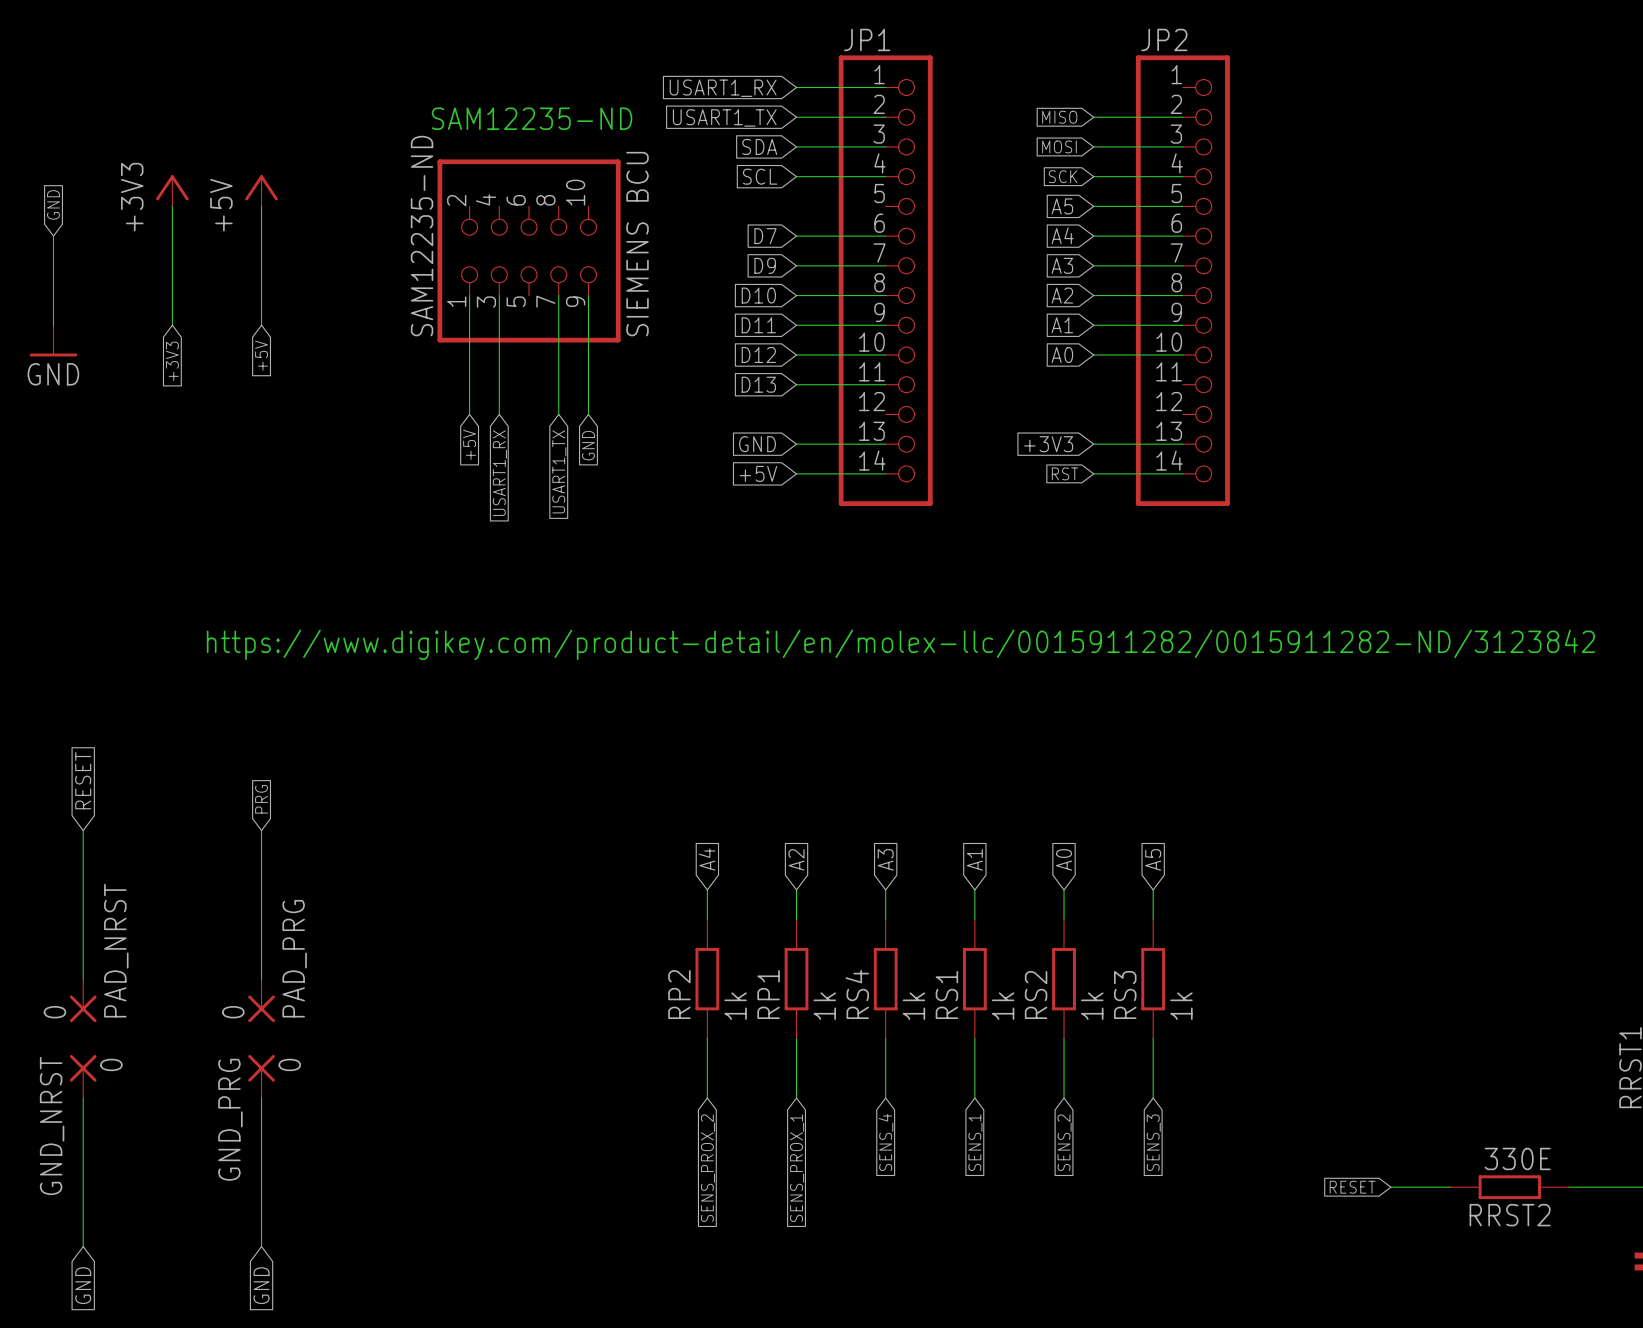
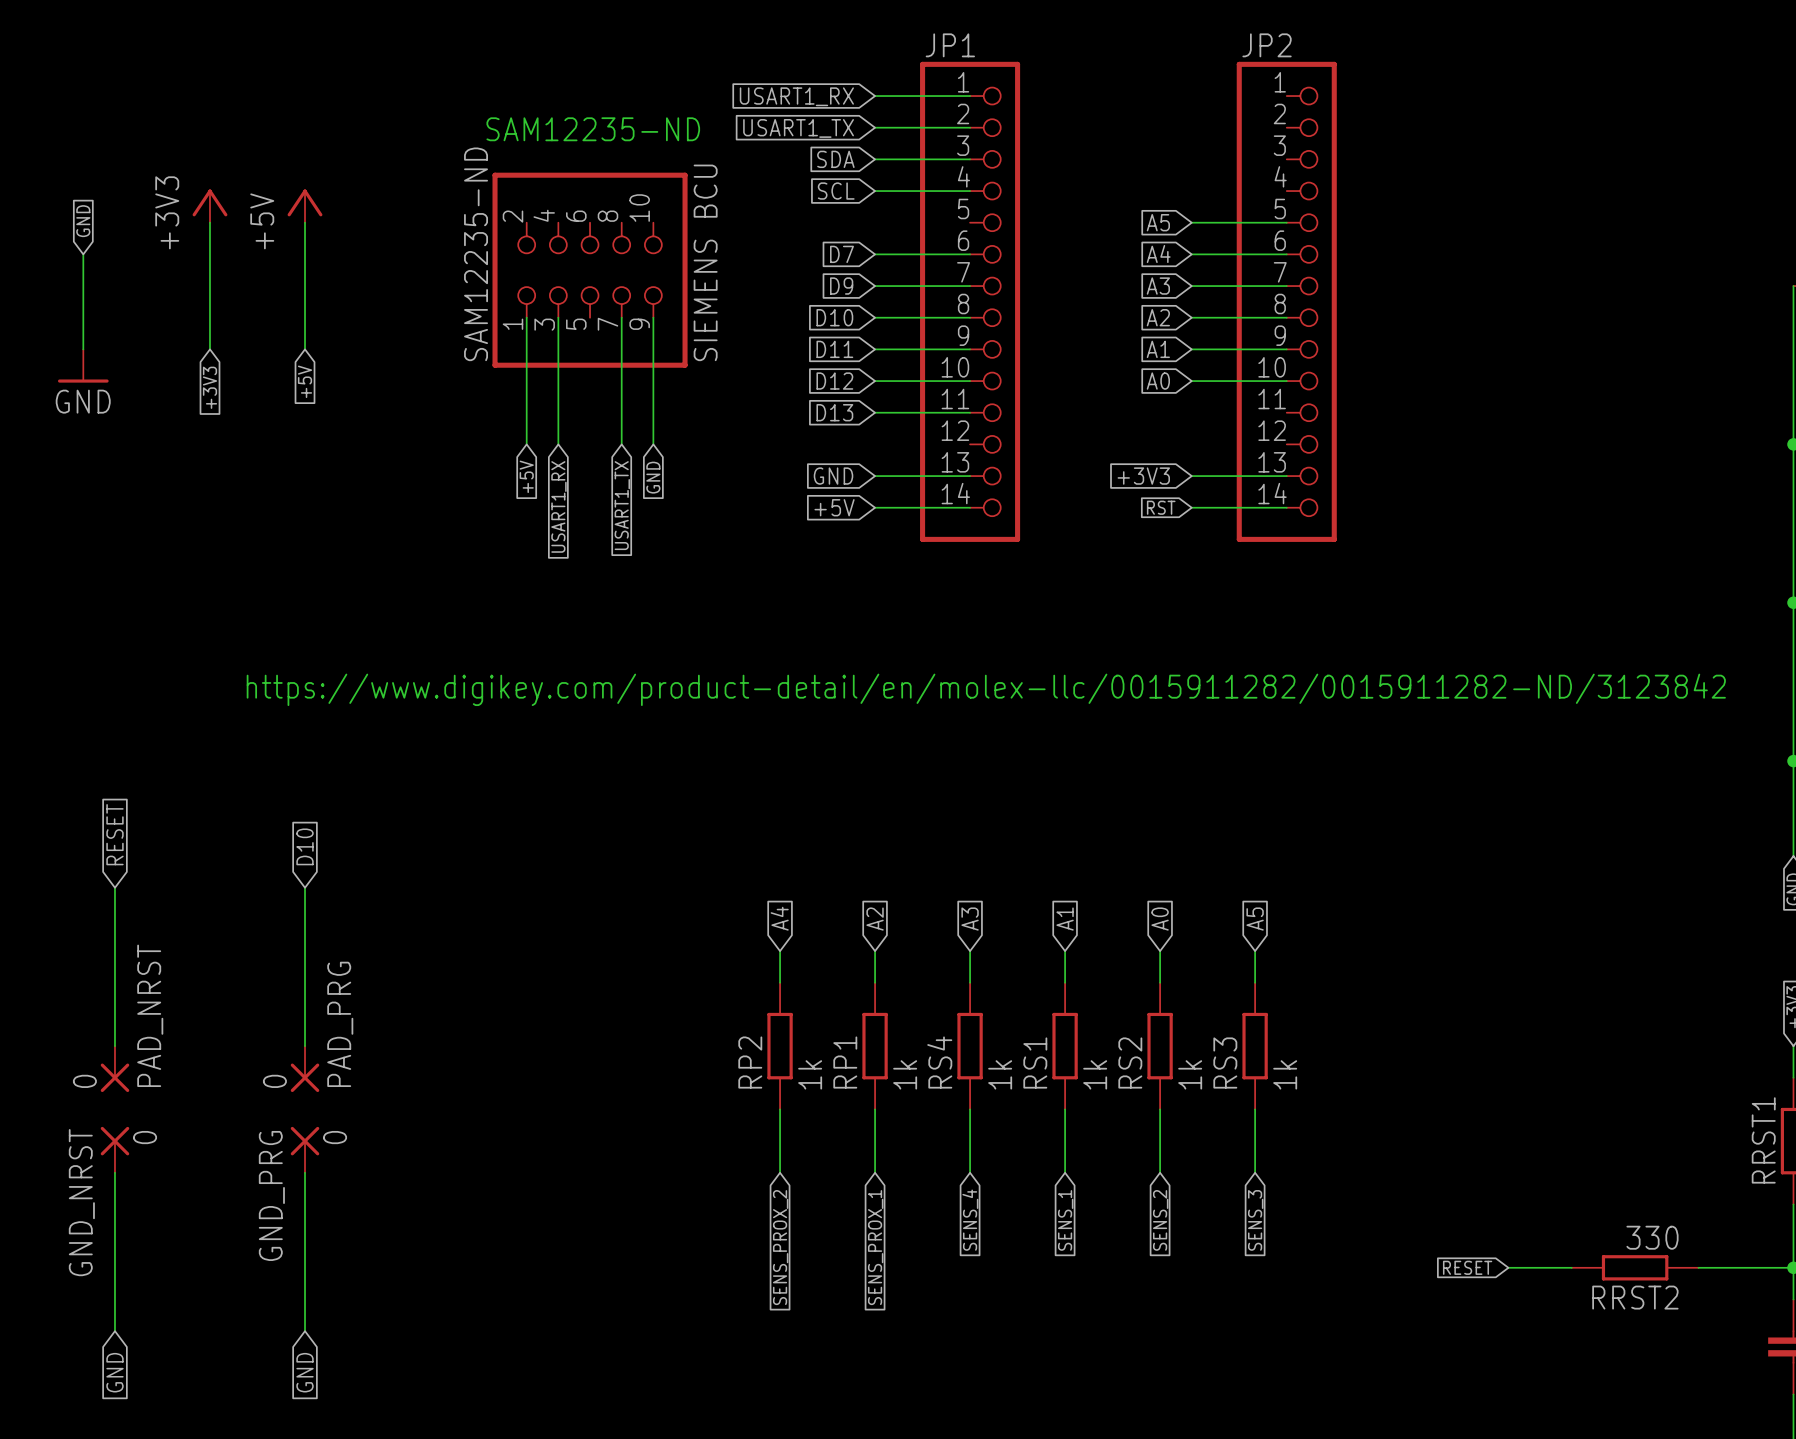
global label: MISO (1059, 117) -> none
wire: (1093, 117) (1182, 117) -> none
global label: MOSI (1059, 146) -> none
wire: (1093, 146) (1182, 146) -> none
global label: SCK (1063, 176) -> none
wire: (1093, 176) (1182, 176) -> none
global label: PRG (261, 799) -> D10 (305, 846)
RRST2 value: 330E (1517, 1158) -> 330 (1652, 1237)

